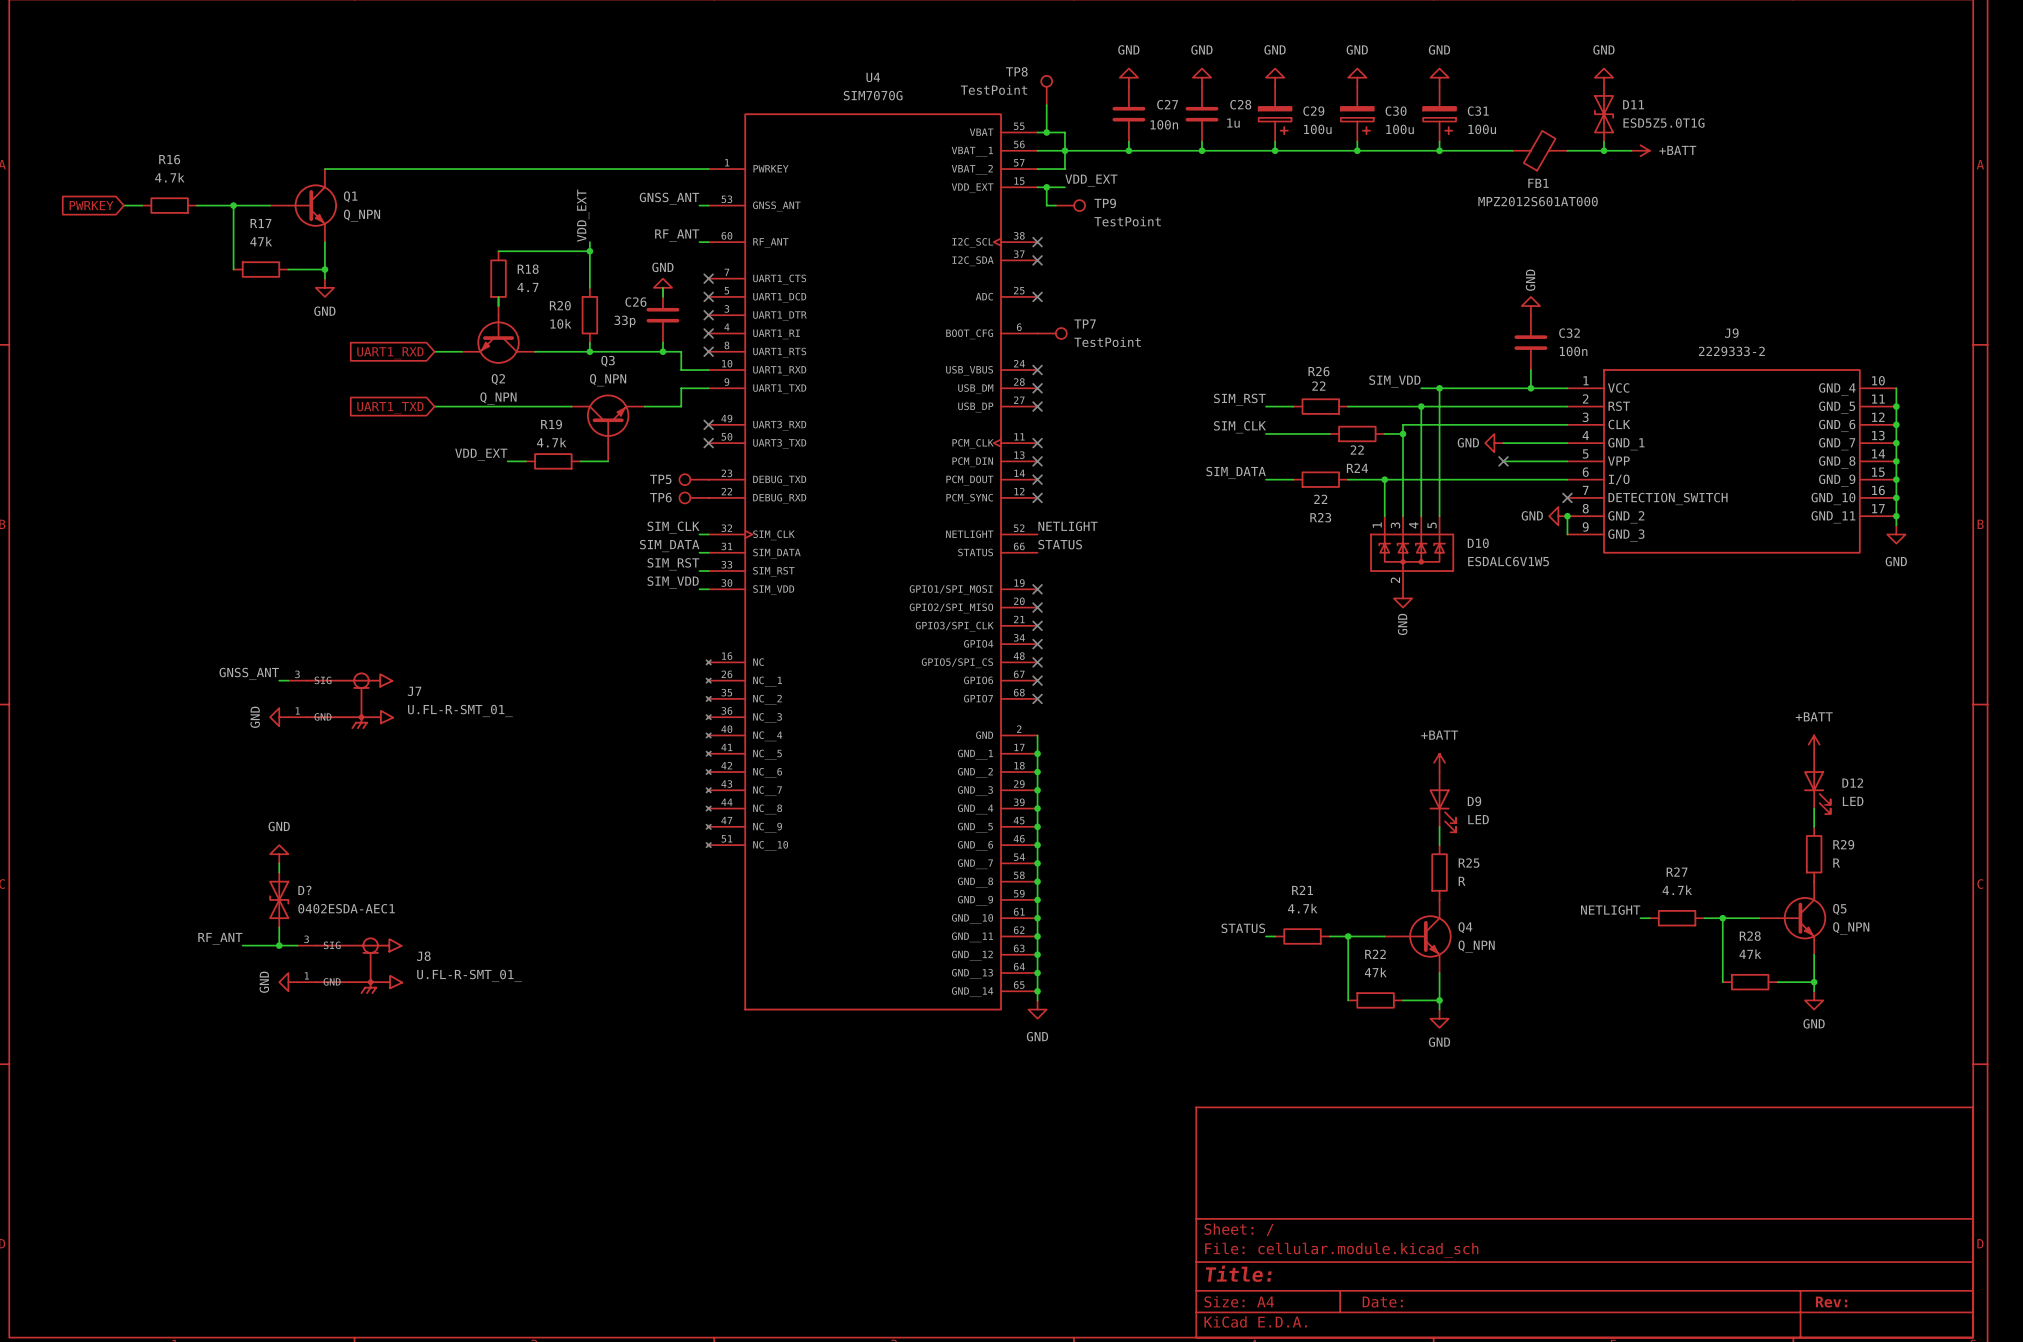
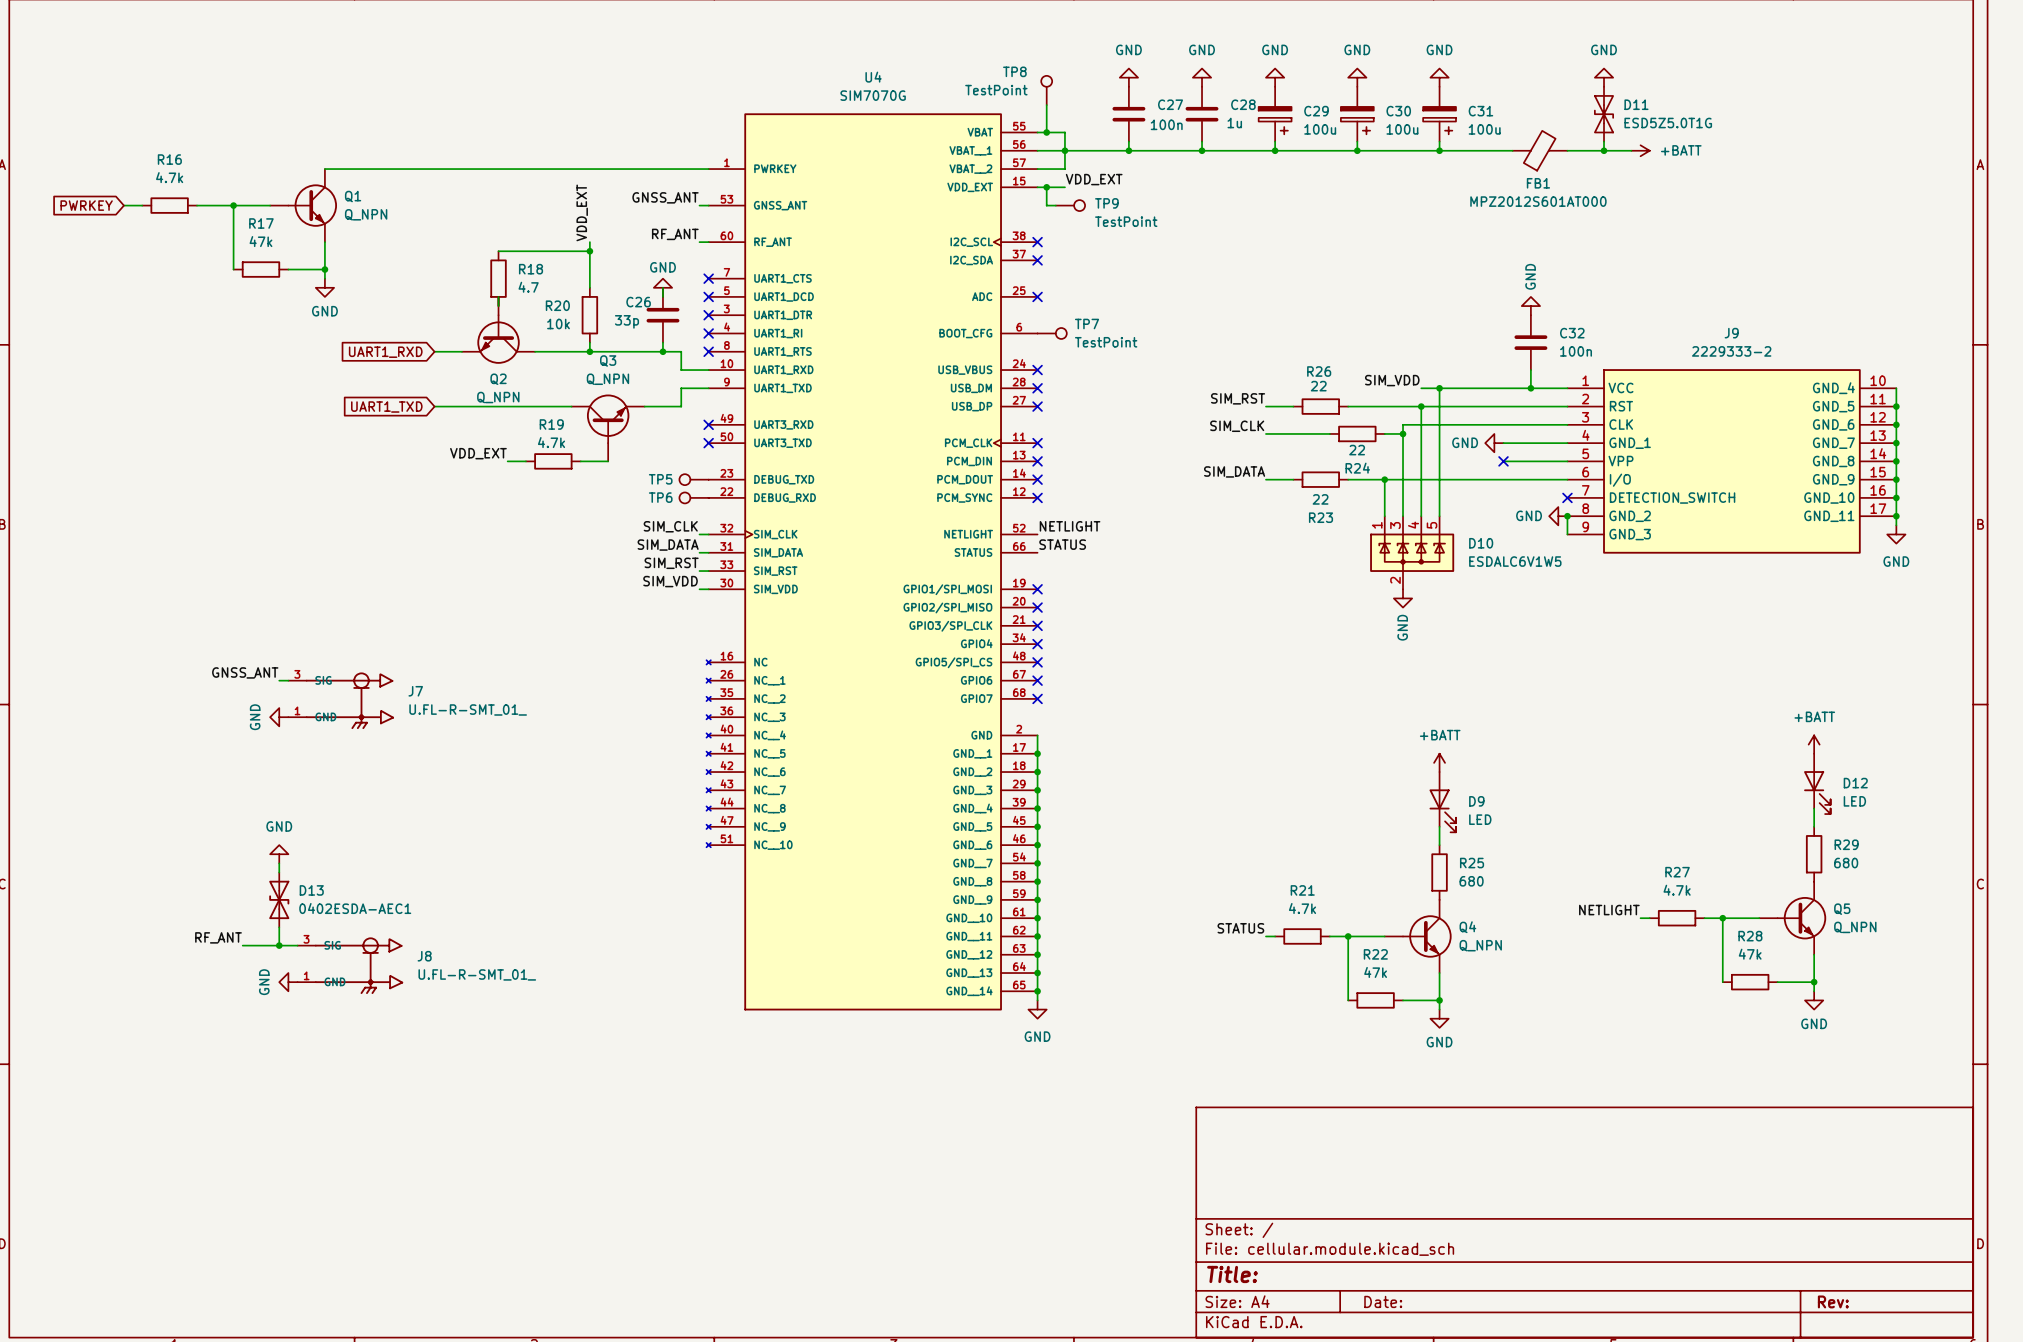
R29 value: R (1836, 863) -> 680 (1846, 863)
R25 value: R (1462, 881) -> 680 (1471, 881)
D? name: D? (304, 890) -> D13 (311, 890)

